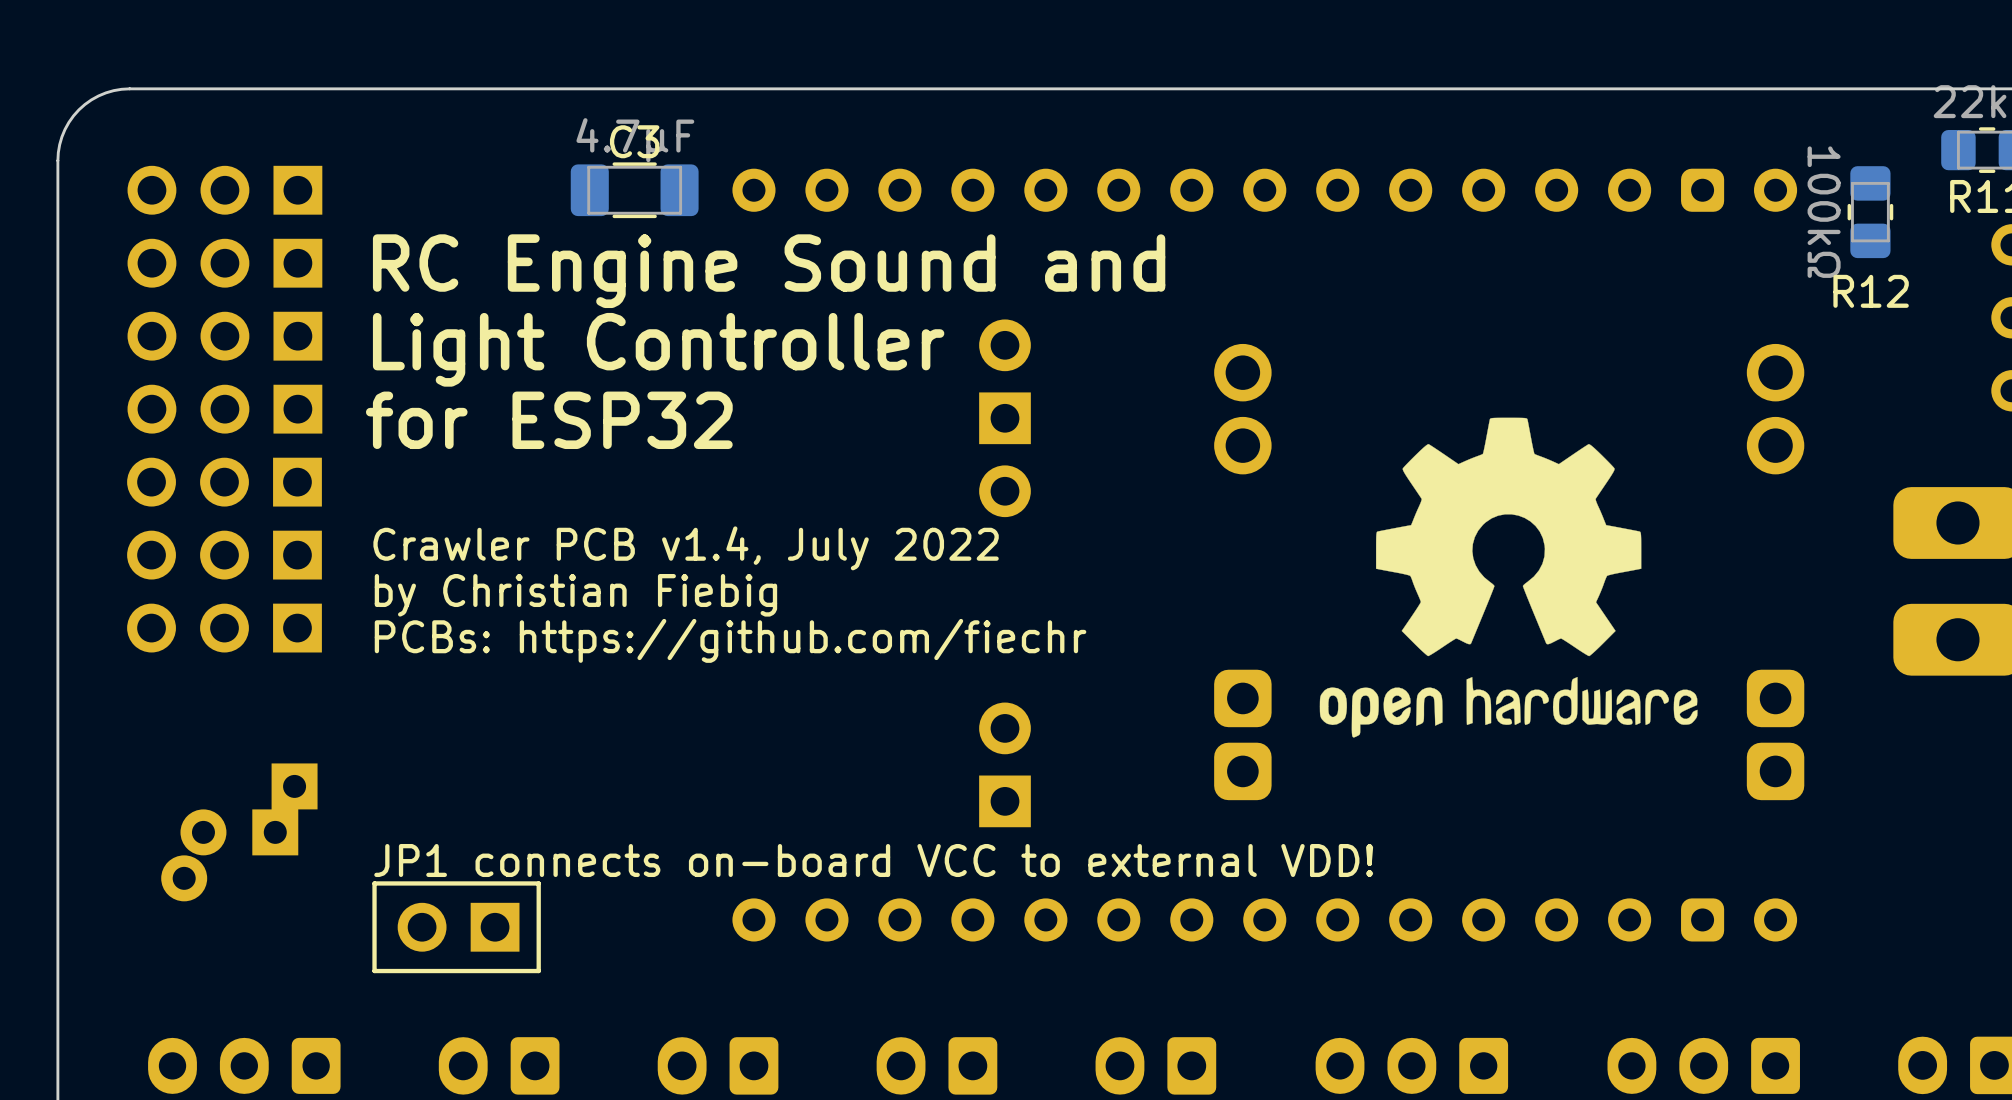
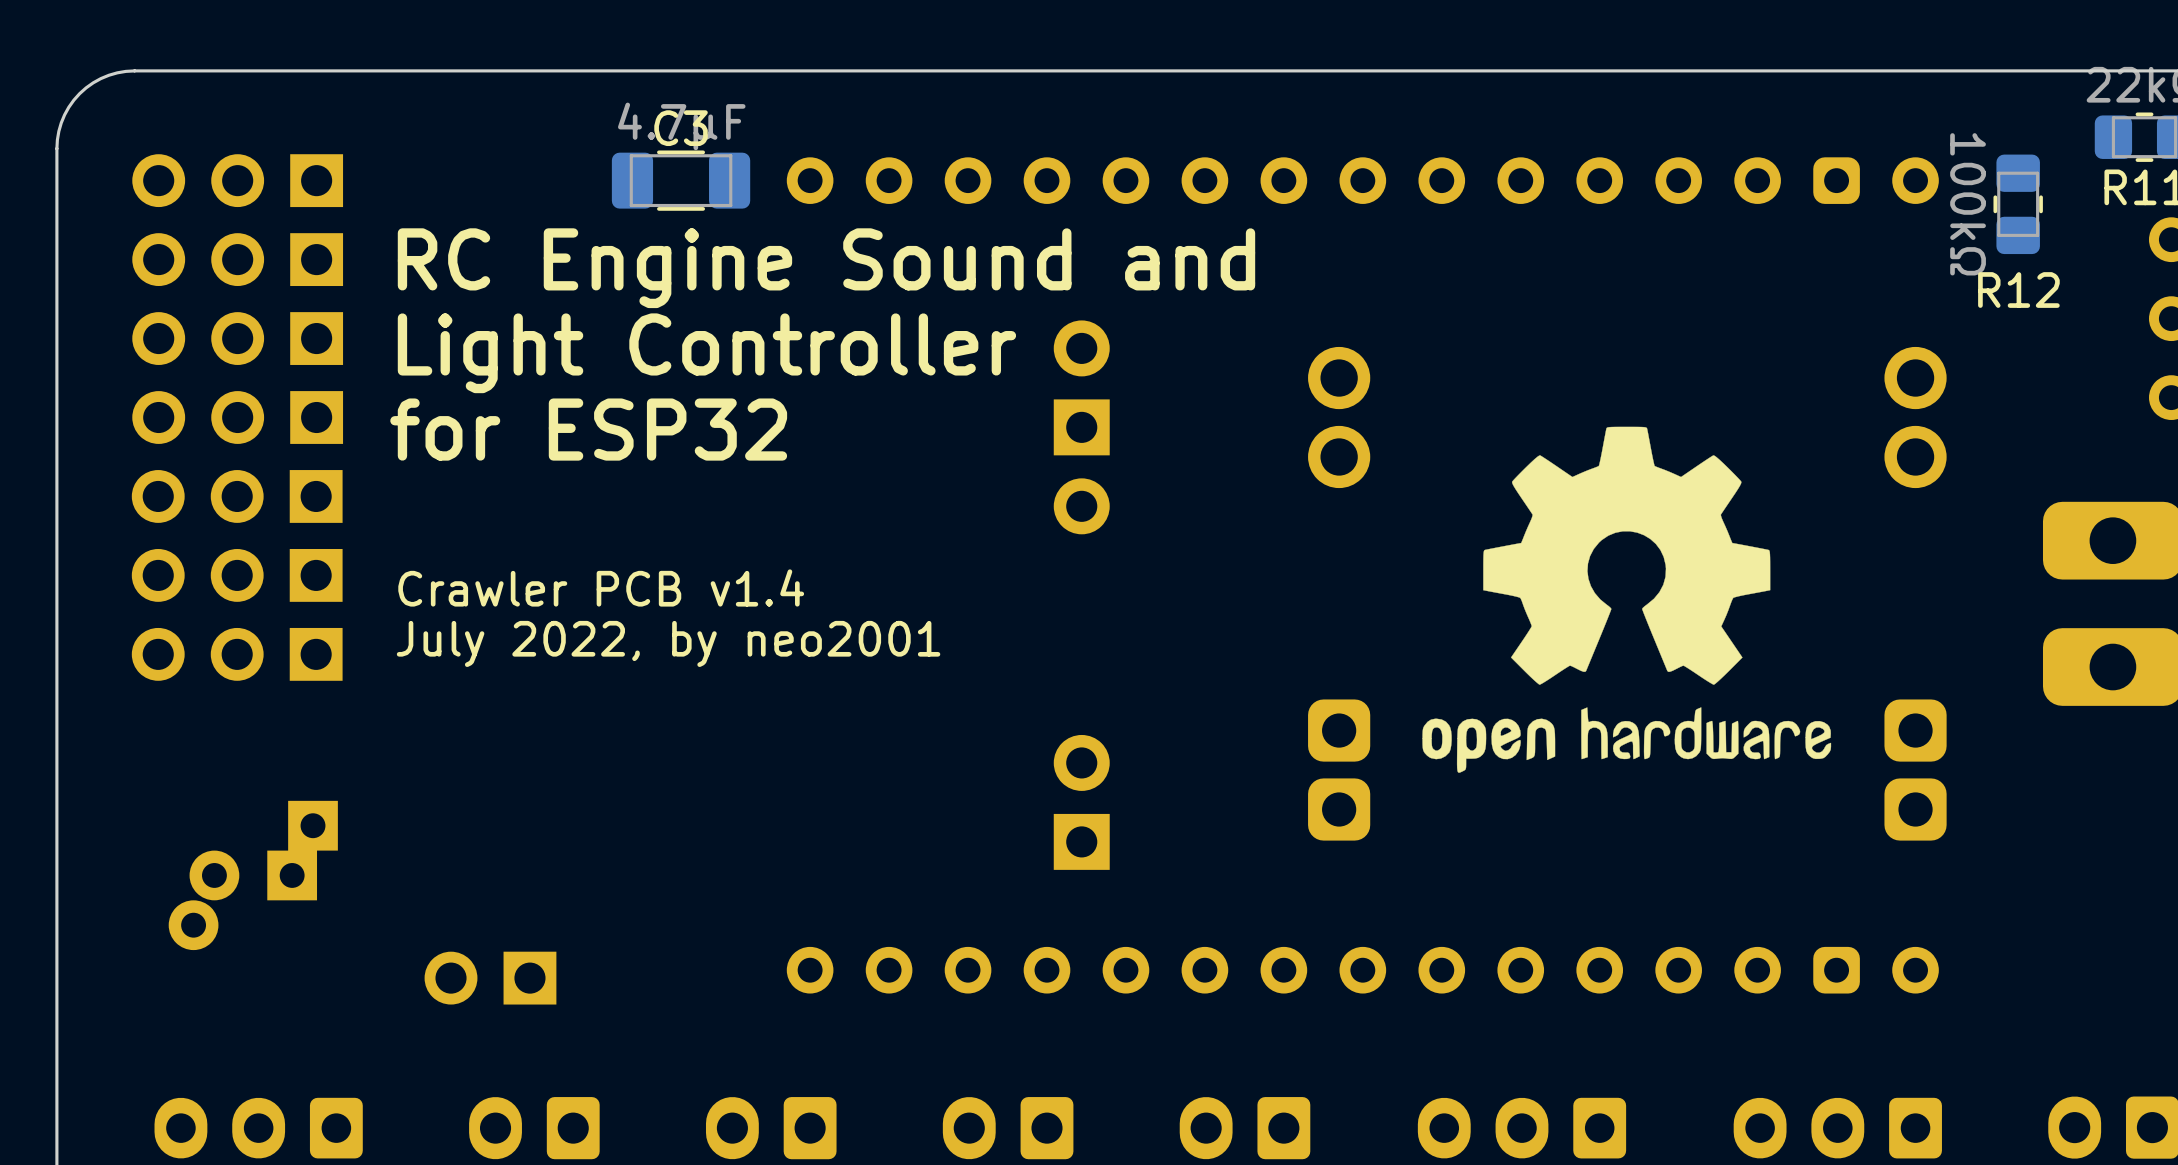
text: Crawler PCB v1.4, July 2022 (686, 548) -> Crawler PCB v1.4 (601, 587)
text: by Christian Fiebig (575, 595) -> none
text: none -> July 2022, by neo2001 (668, 643)
text: PCBs: https://github.com/fiechr (730, 640) -> none
text: JP1 connects on-board VCC to external VDD! (873, 860) -> none
line: (538, 883) (374, 883) (374, 971) (538, 971) (538, 883) -> none

